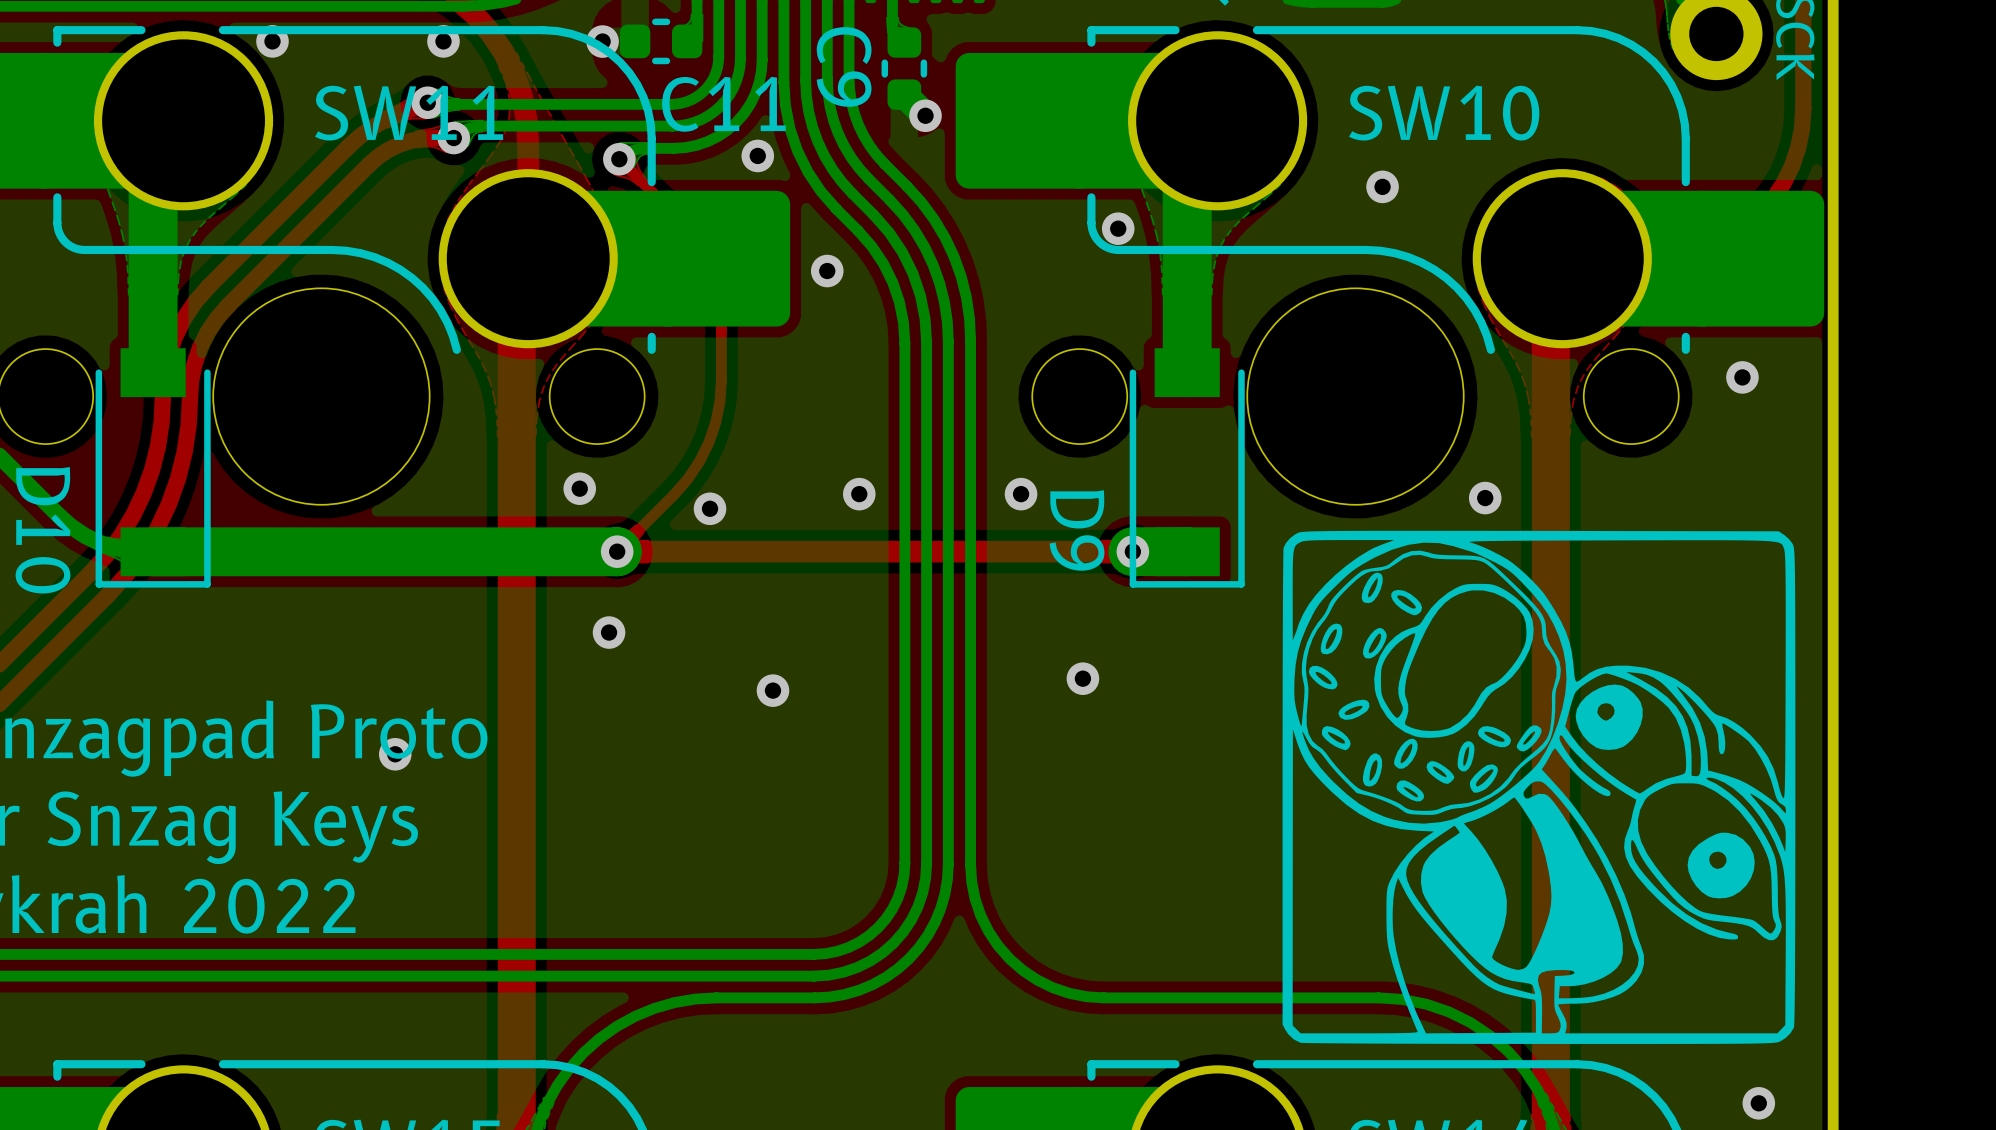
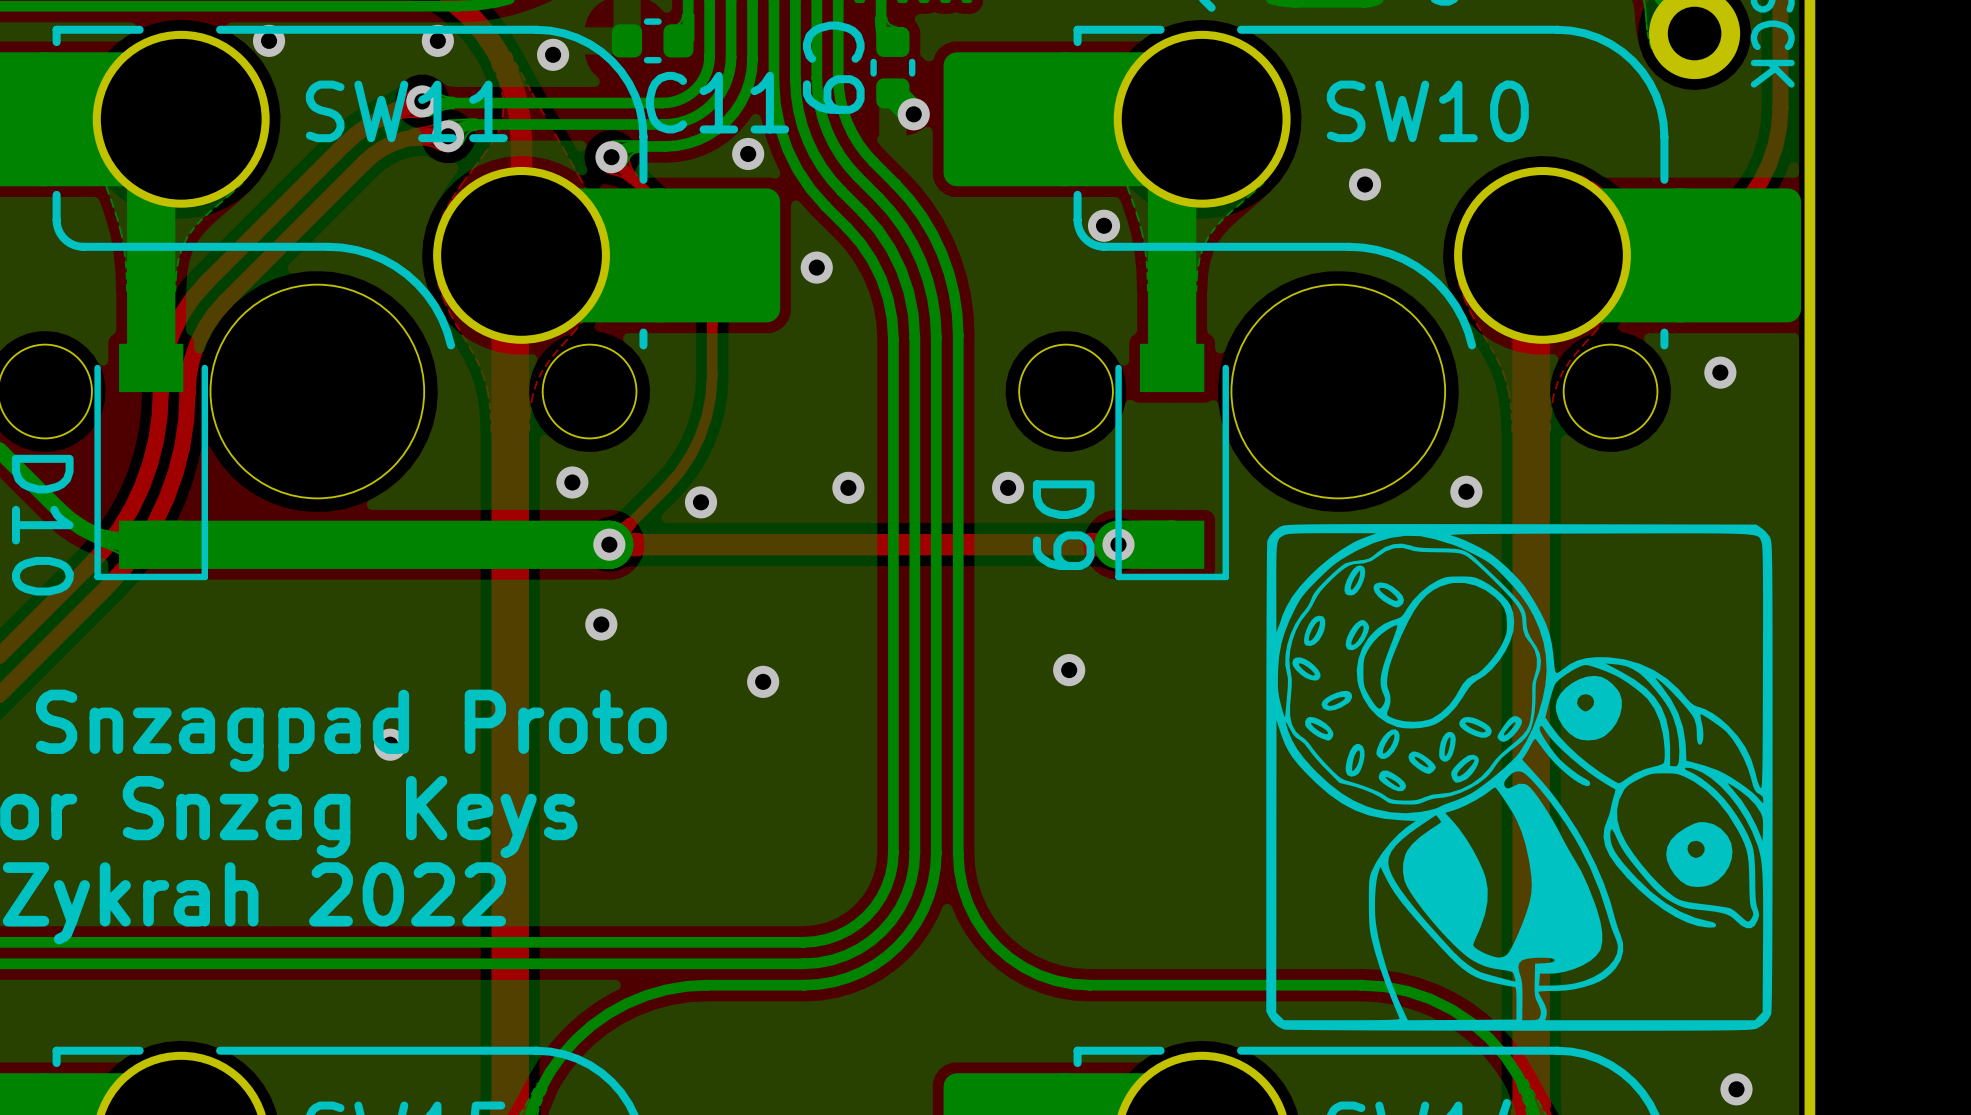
via position: (602, 41) -> (553, 54)

